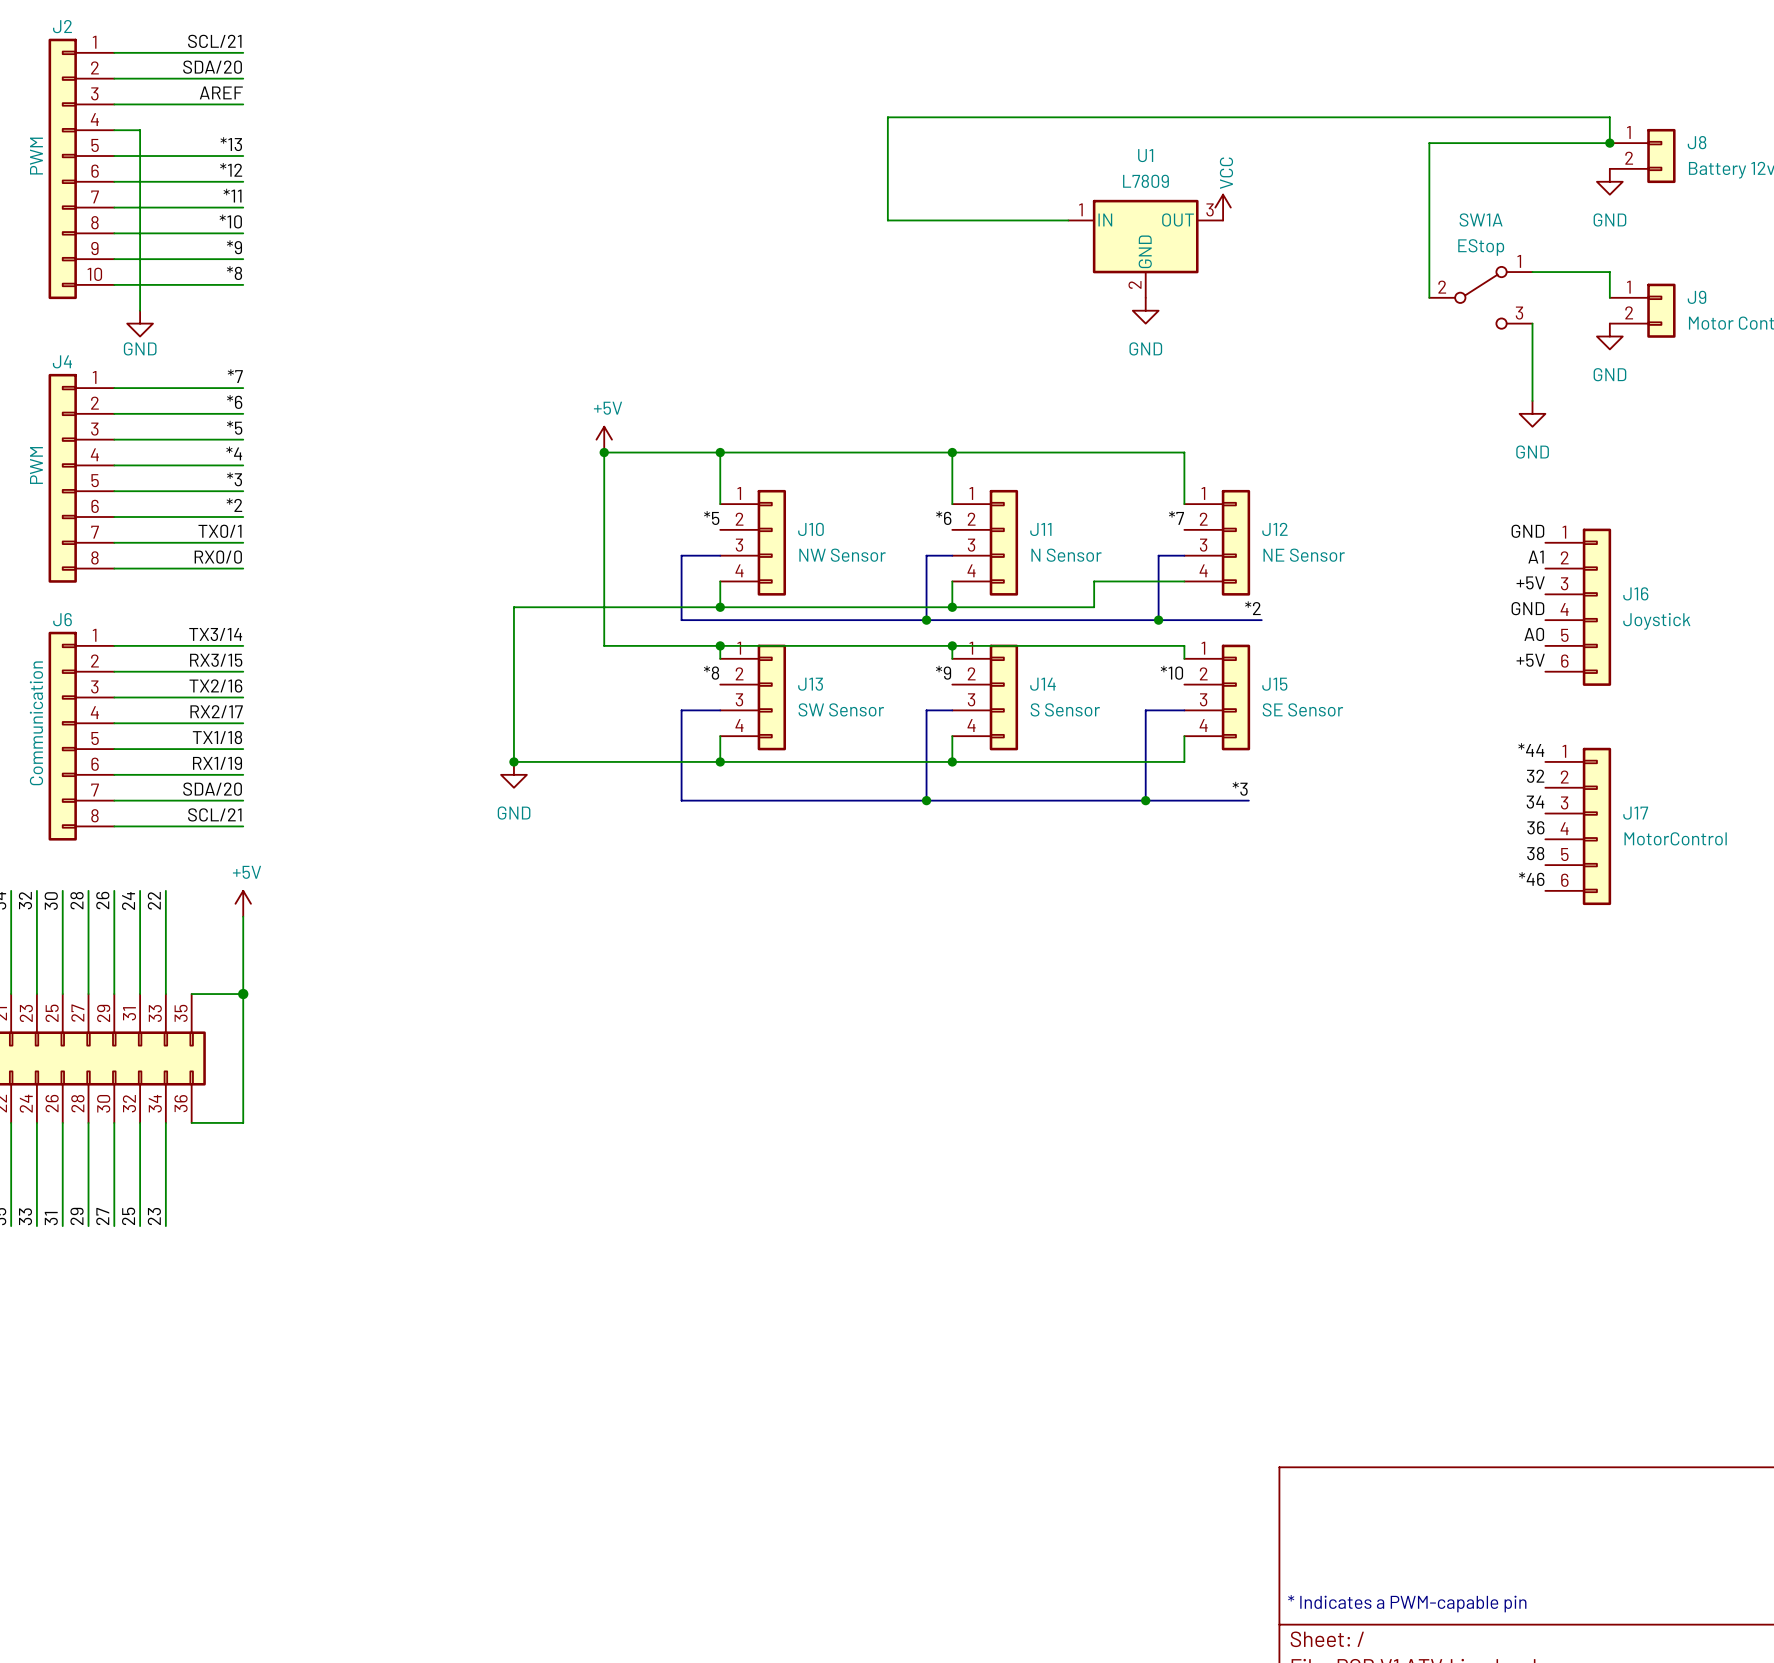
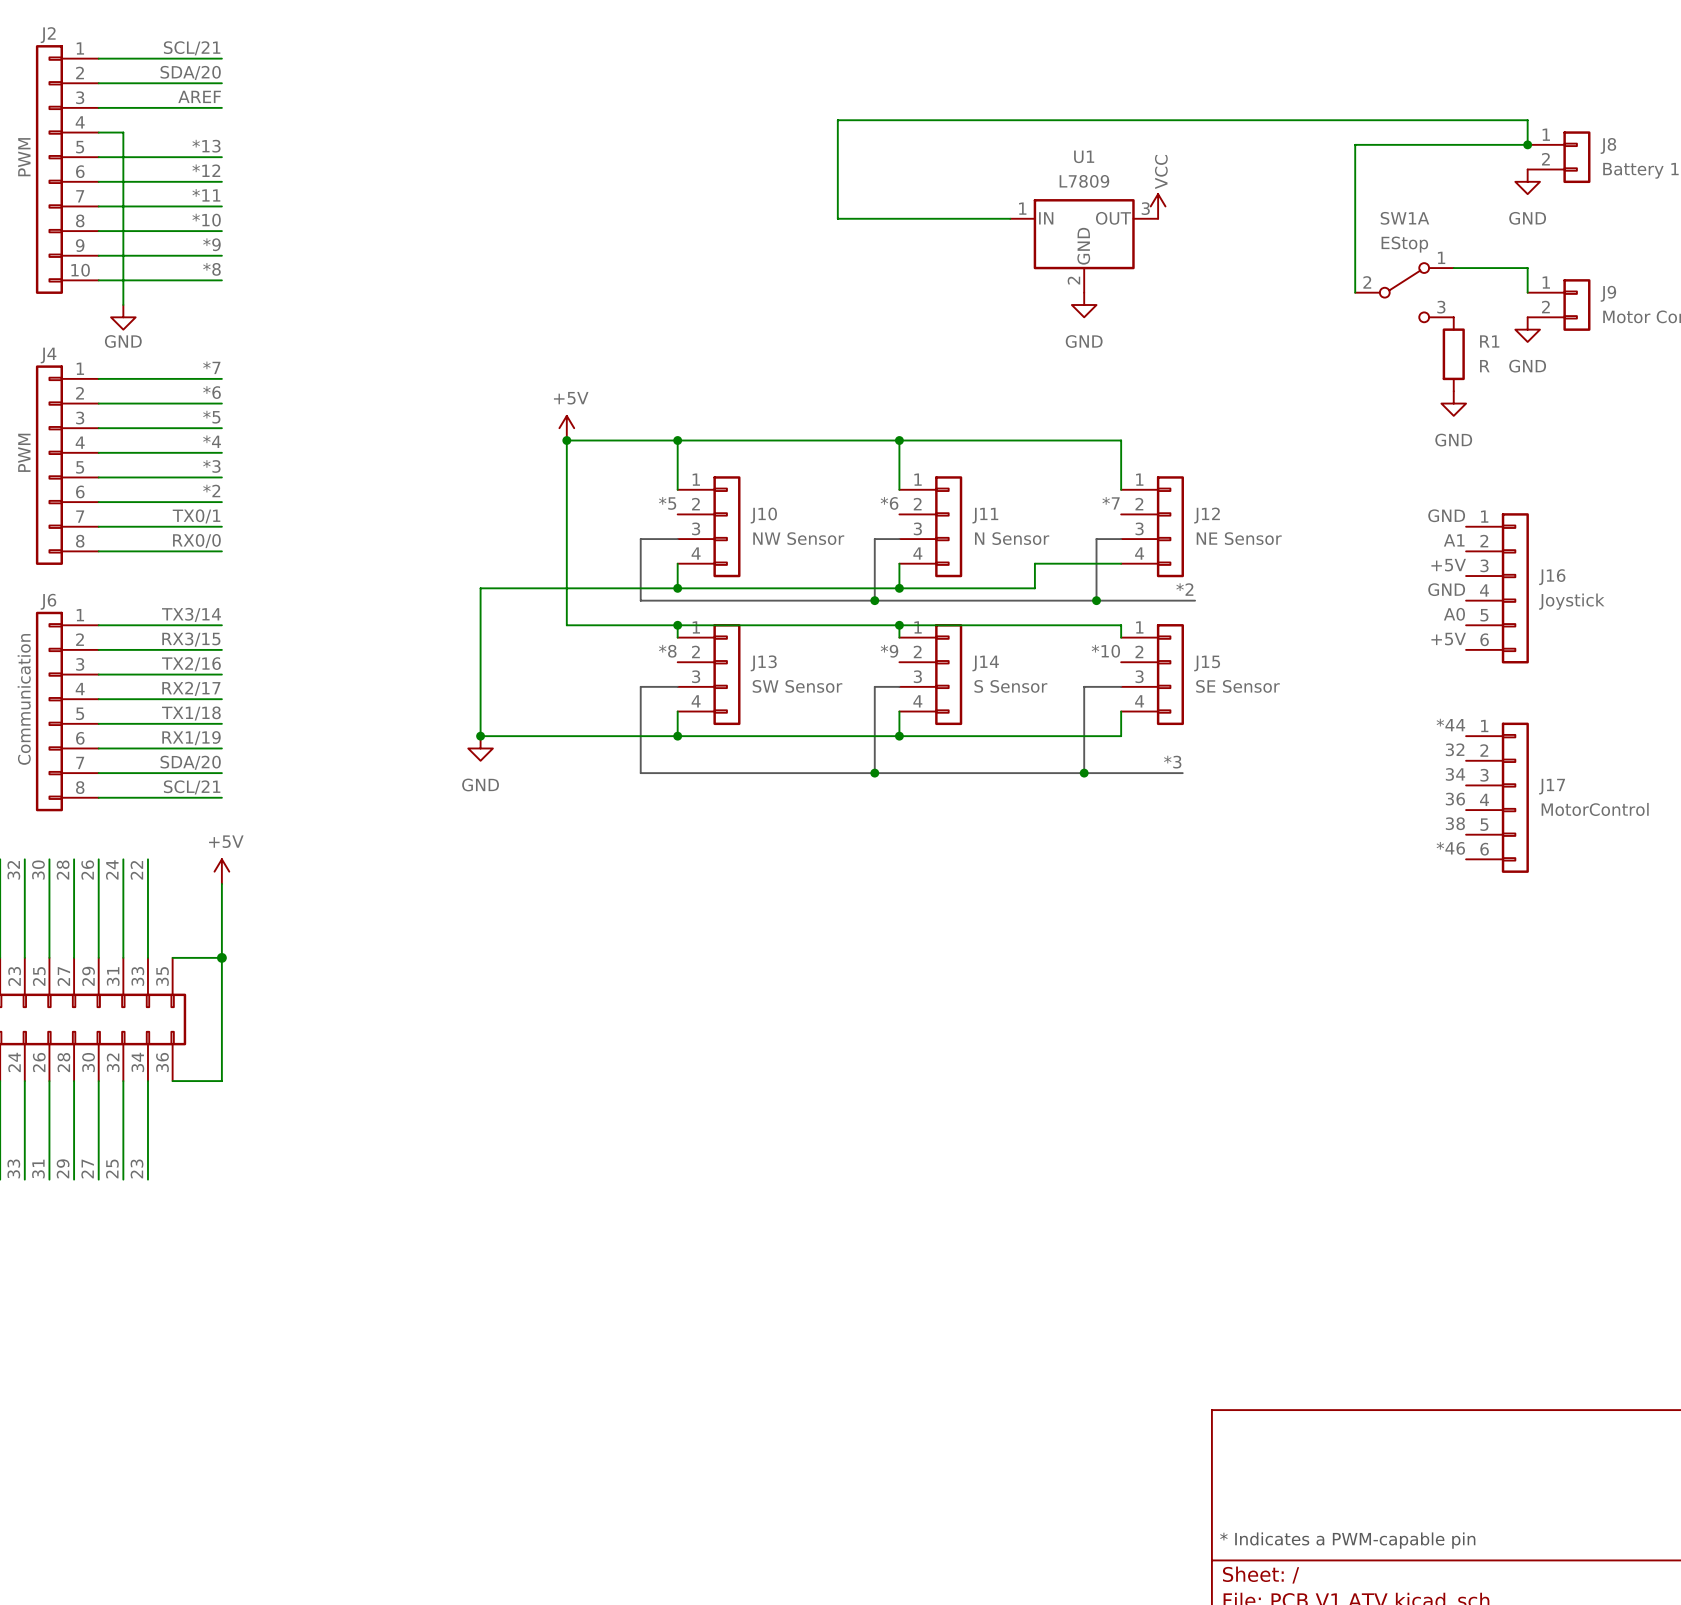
wire: (1532, 323) (1532, 400) -> none
R1: none -> R (1453, 354)

